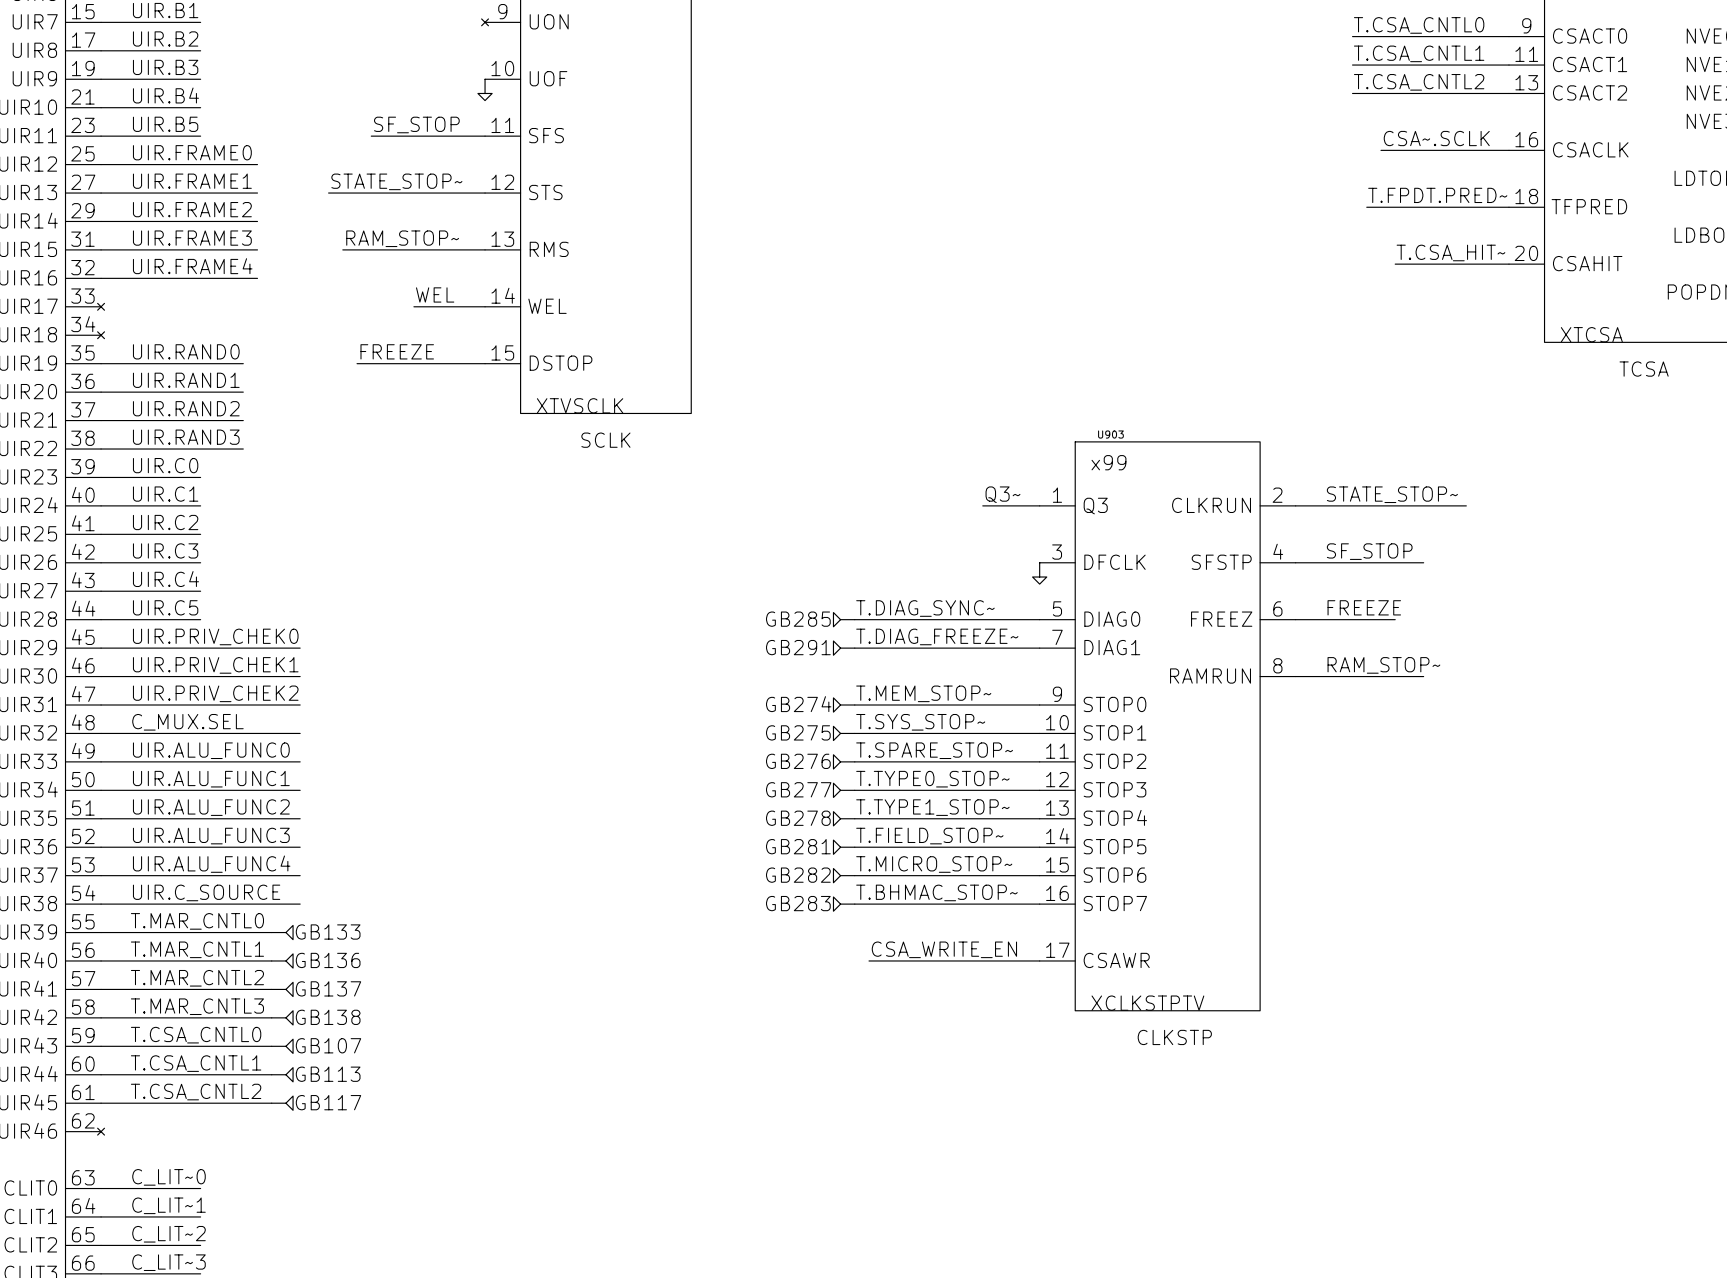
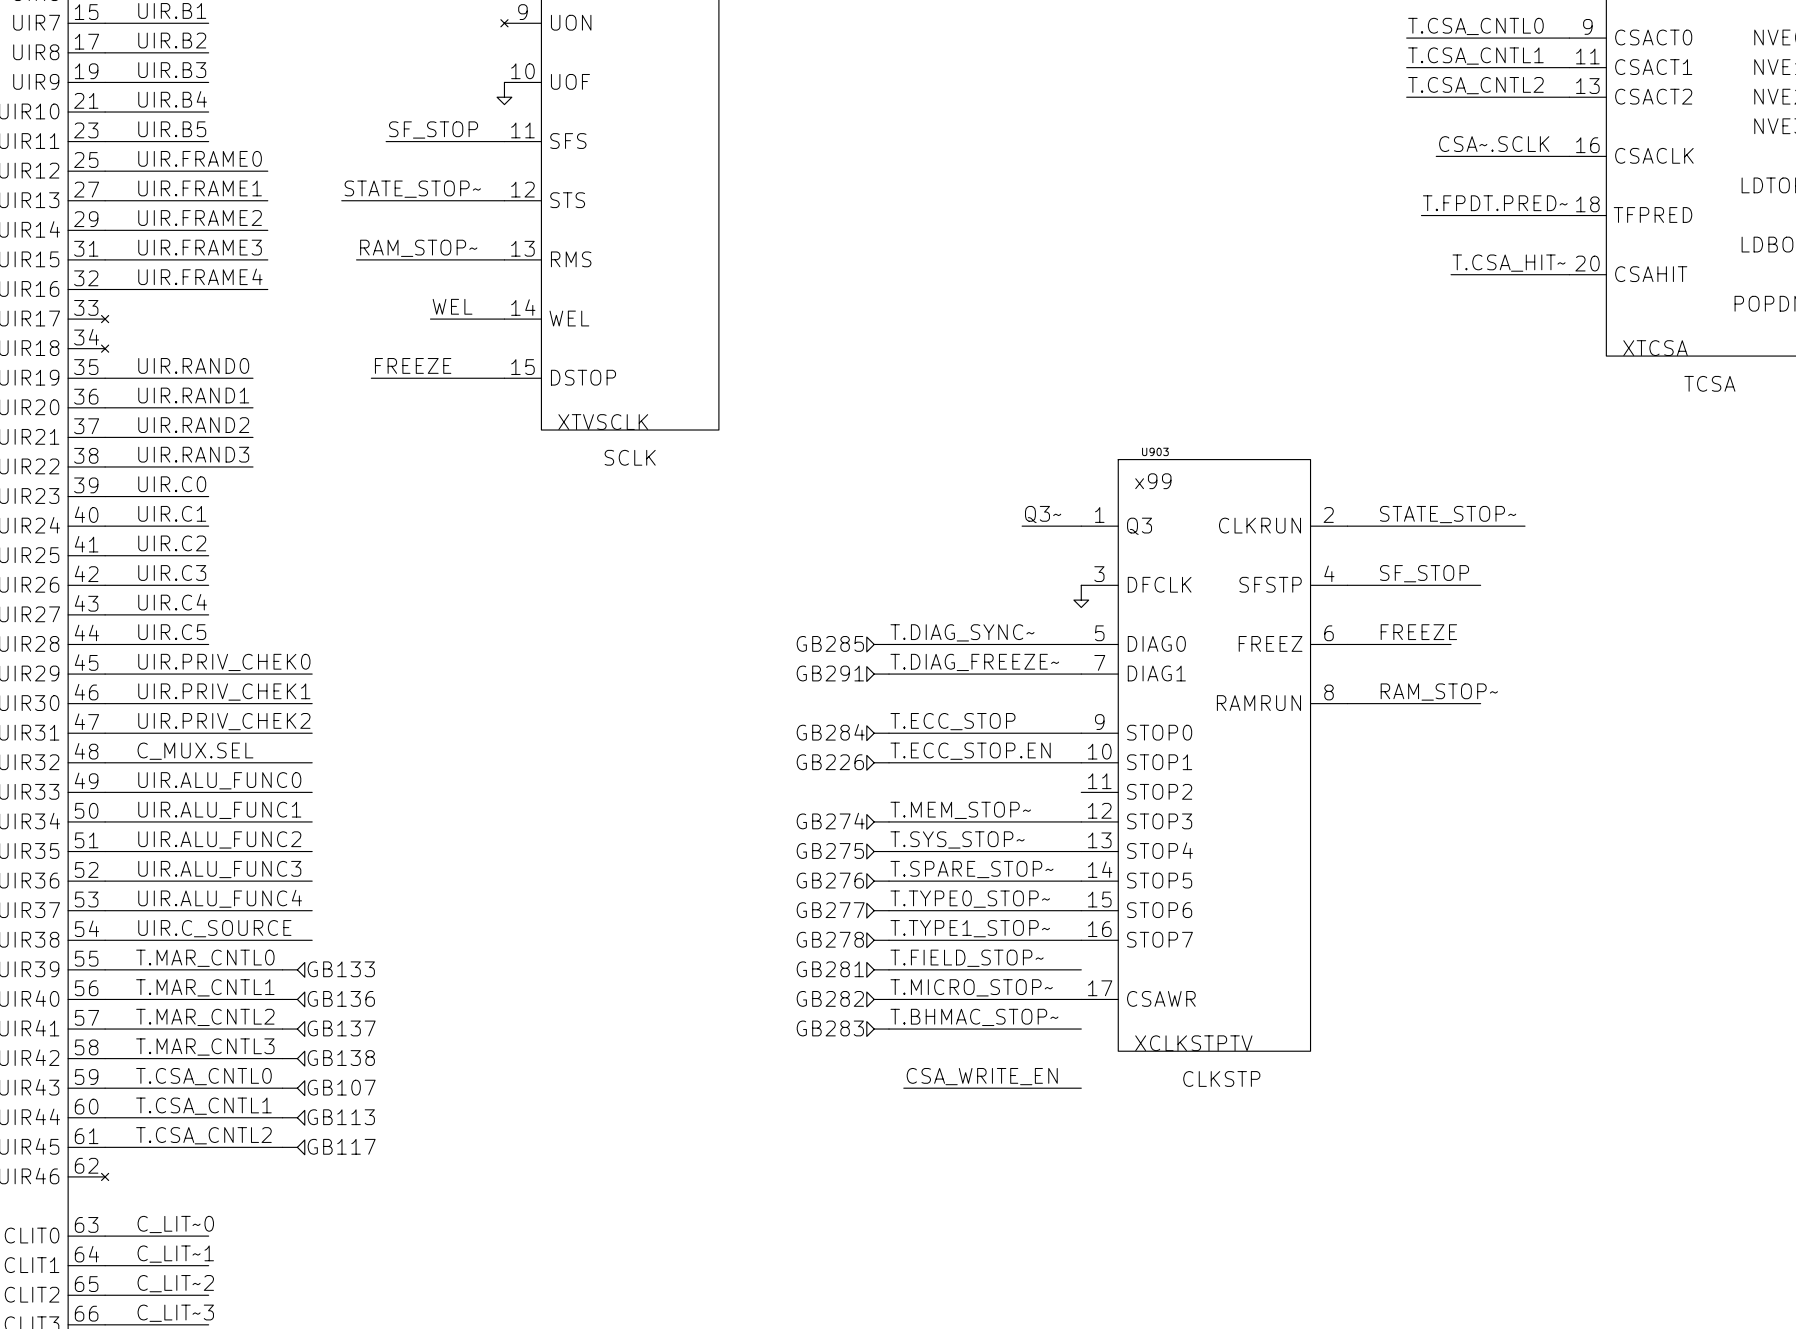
label: T.MEM_STOP~ (923, 693) -> T.ECC_STOP (952, 721)
GB274 name: GB274 (798, 704) -> GB284 (830, 732)
label: T.SYS_STOP~ (920, 722) -> T.ECC_STOP.EN (970, 751)
GB275 name: GB275 (798, 732) -> GB226 (830, 762)
label: T.SPARE_STOP~ (934, 750) -> none
GB276: (843, 761) -> none
wire: (854, 761) (1039, 761) -> none
label: T.TYPE0_STOP~ (932, 779) -> T.MEM_STOP~ (960, 810)
GB277 name: GB277 (798, 789) -> GB274 (830, 821)
label: T.TYPE1_STOP~ (932, 807) -> T.SYS_STOP~ (957, 839)
GB278 name: GB278 (798, 818) -> GB275 (830, 850)
label: T.FIELD_STOP~ (929, 836) -> T.SPARE_STOP~ (971, 869)
GB281 name: GB281 (798, 846) -> GB276 (830, 880)
label: T.MICRO_STOP~ (934, 864) -> T.TYPE0_STOP~ (970, 899)
GB282 name: GB282 (798, 875) -> GB277 (830, 910)
label: T.BHMAC_STOP~ (936, 892) -> T.TYPE1_STOP~ (970, 928)
GB283 name: GB283 (798, 903) -> GB278 (830, 939)
label: none -> T.FIELD_STOP~ (967, 958)
GB281: none -> (877, 969)
wire: none -> (889, 969) (1081, 969)
label: none -> T.MICRO_STOP~ (971, 987)
label position: CSA_WRITE_EN (944, 949) -> CSA_WRITE_EN (982, 1076)
GB282: none -> (877, 999)
wire: none -> (889, 999) (903, 999)
label: none -> T.BHMAC_STOP~ (974, 1017)
GB283: none -> (877, 1029)
wire: none -> (889, 1029) (1081, 1029)
wire: none -> (903, 1088) (1081, 1088)

